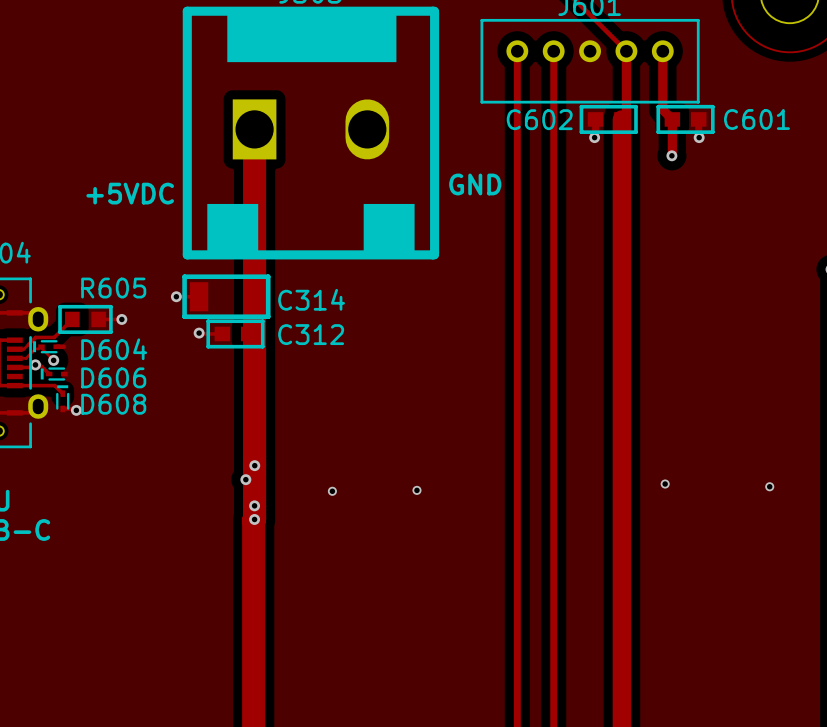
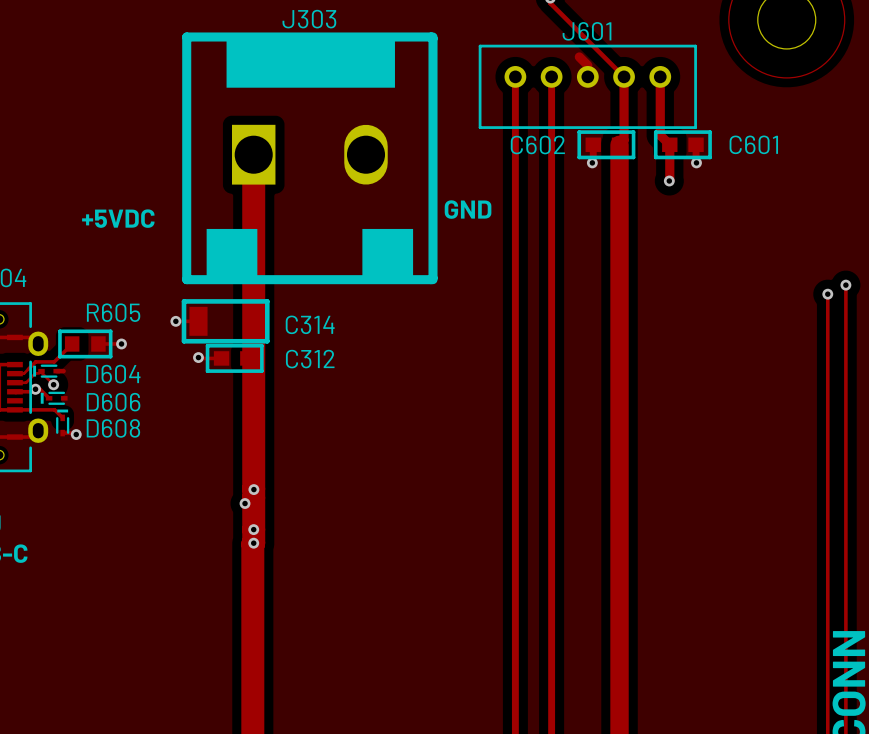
track: none -> (579, 56) (587, 65) (587, 76)
via: (665, 484) -> none
via: (769, 486) -> none
via: (416, 490) -> none
via: (332, 491) -> none

